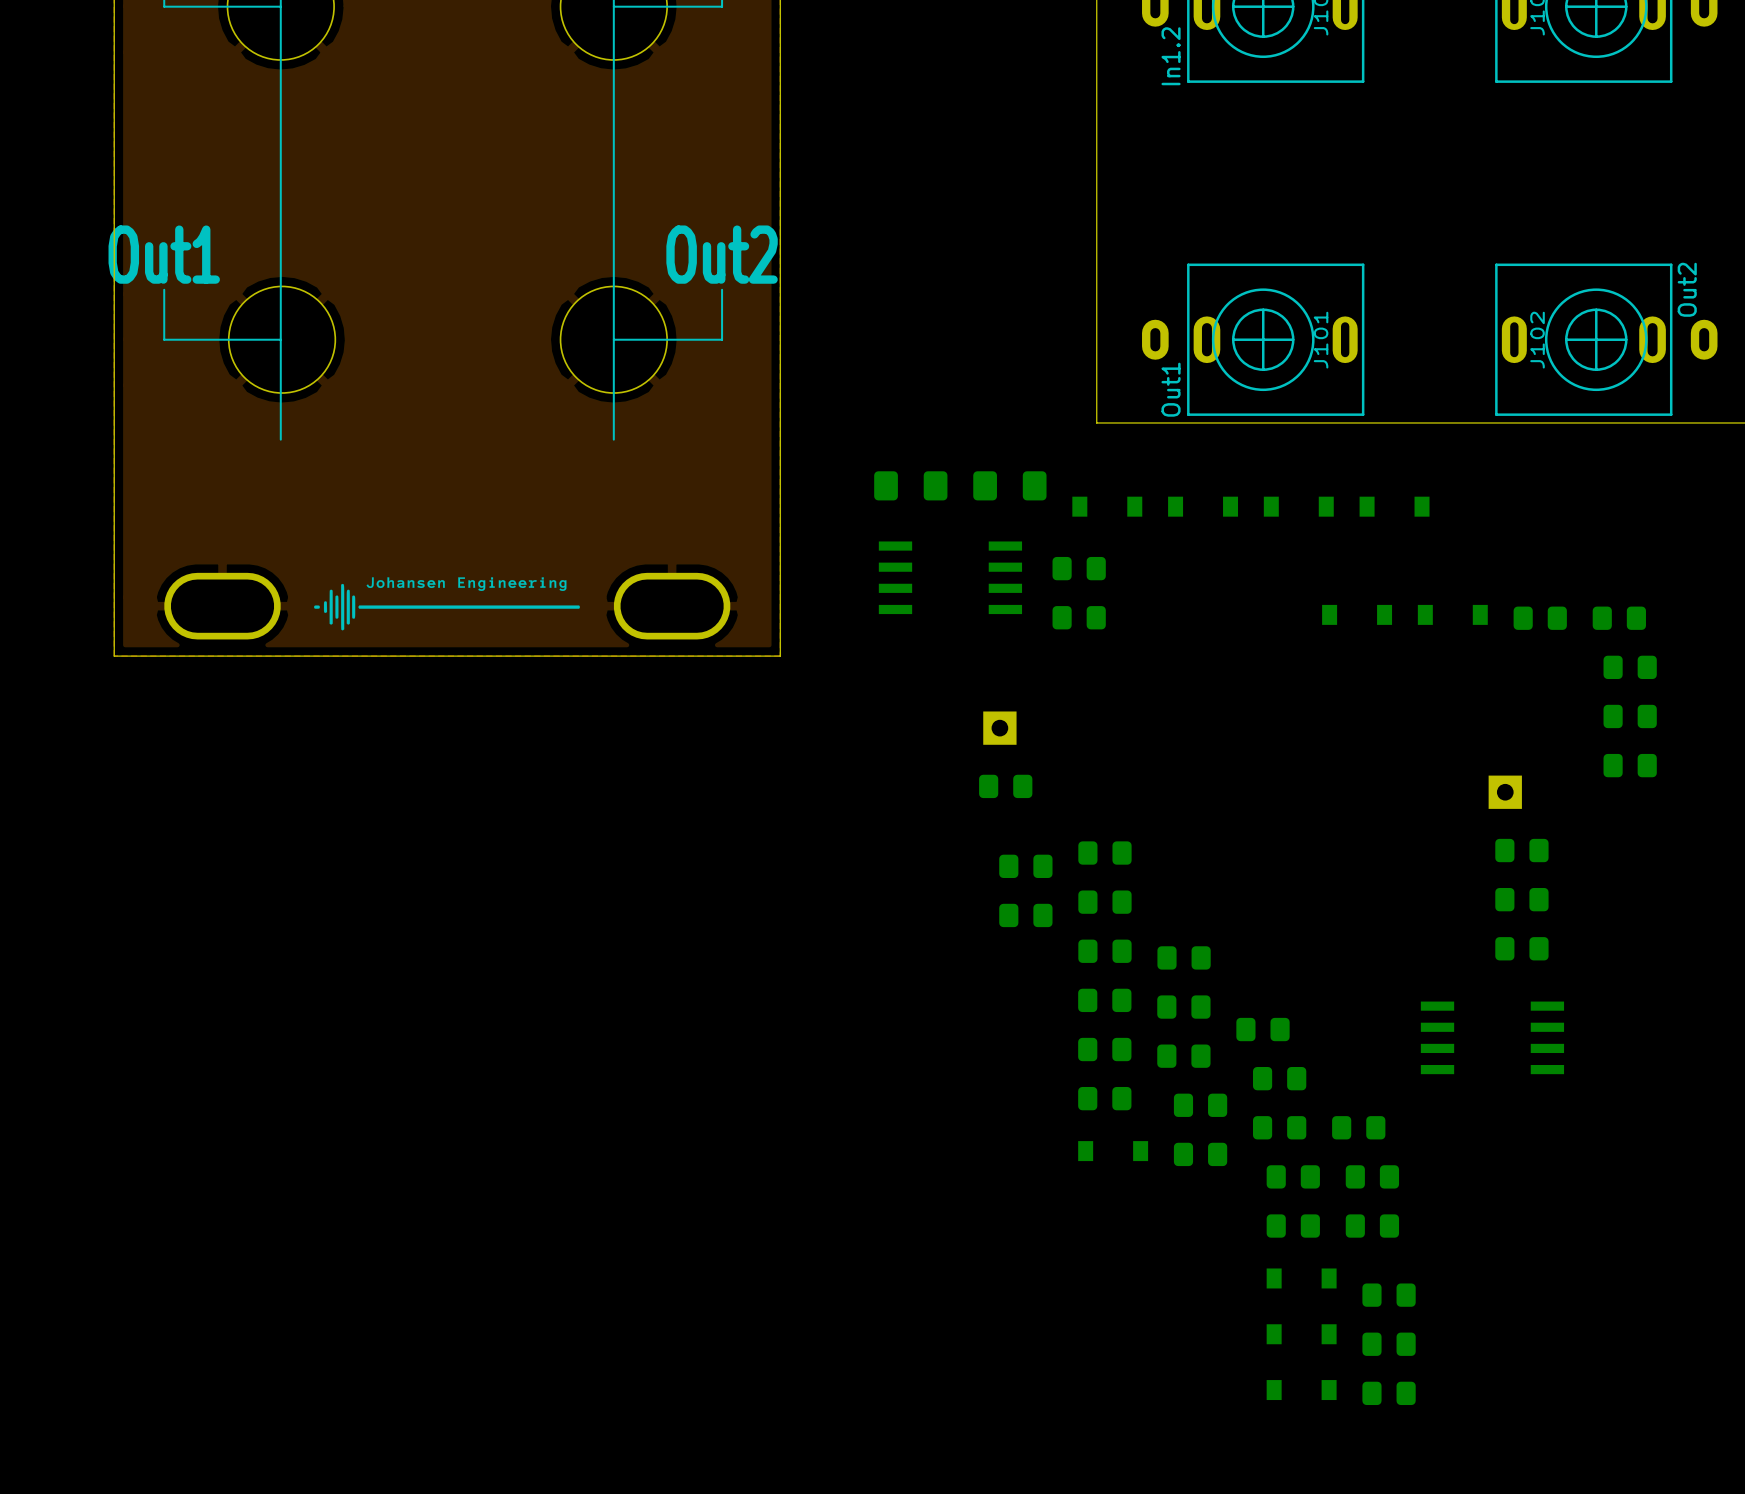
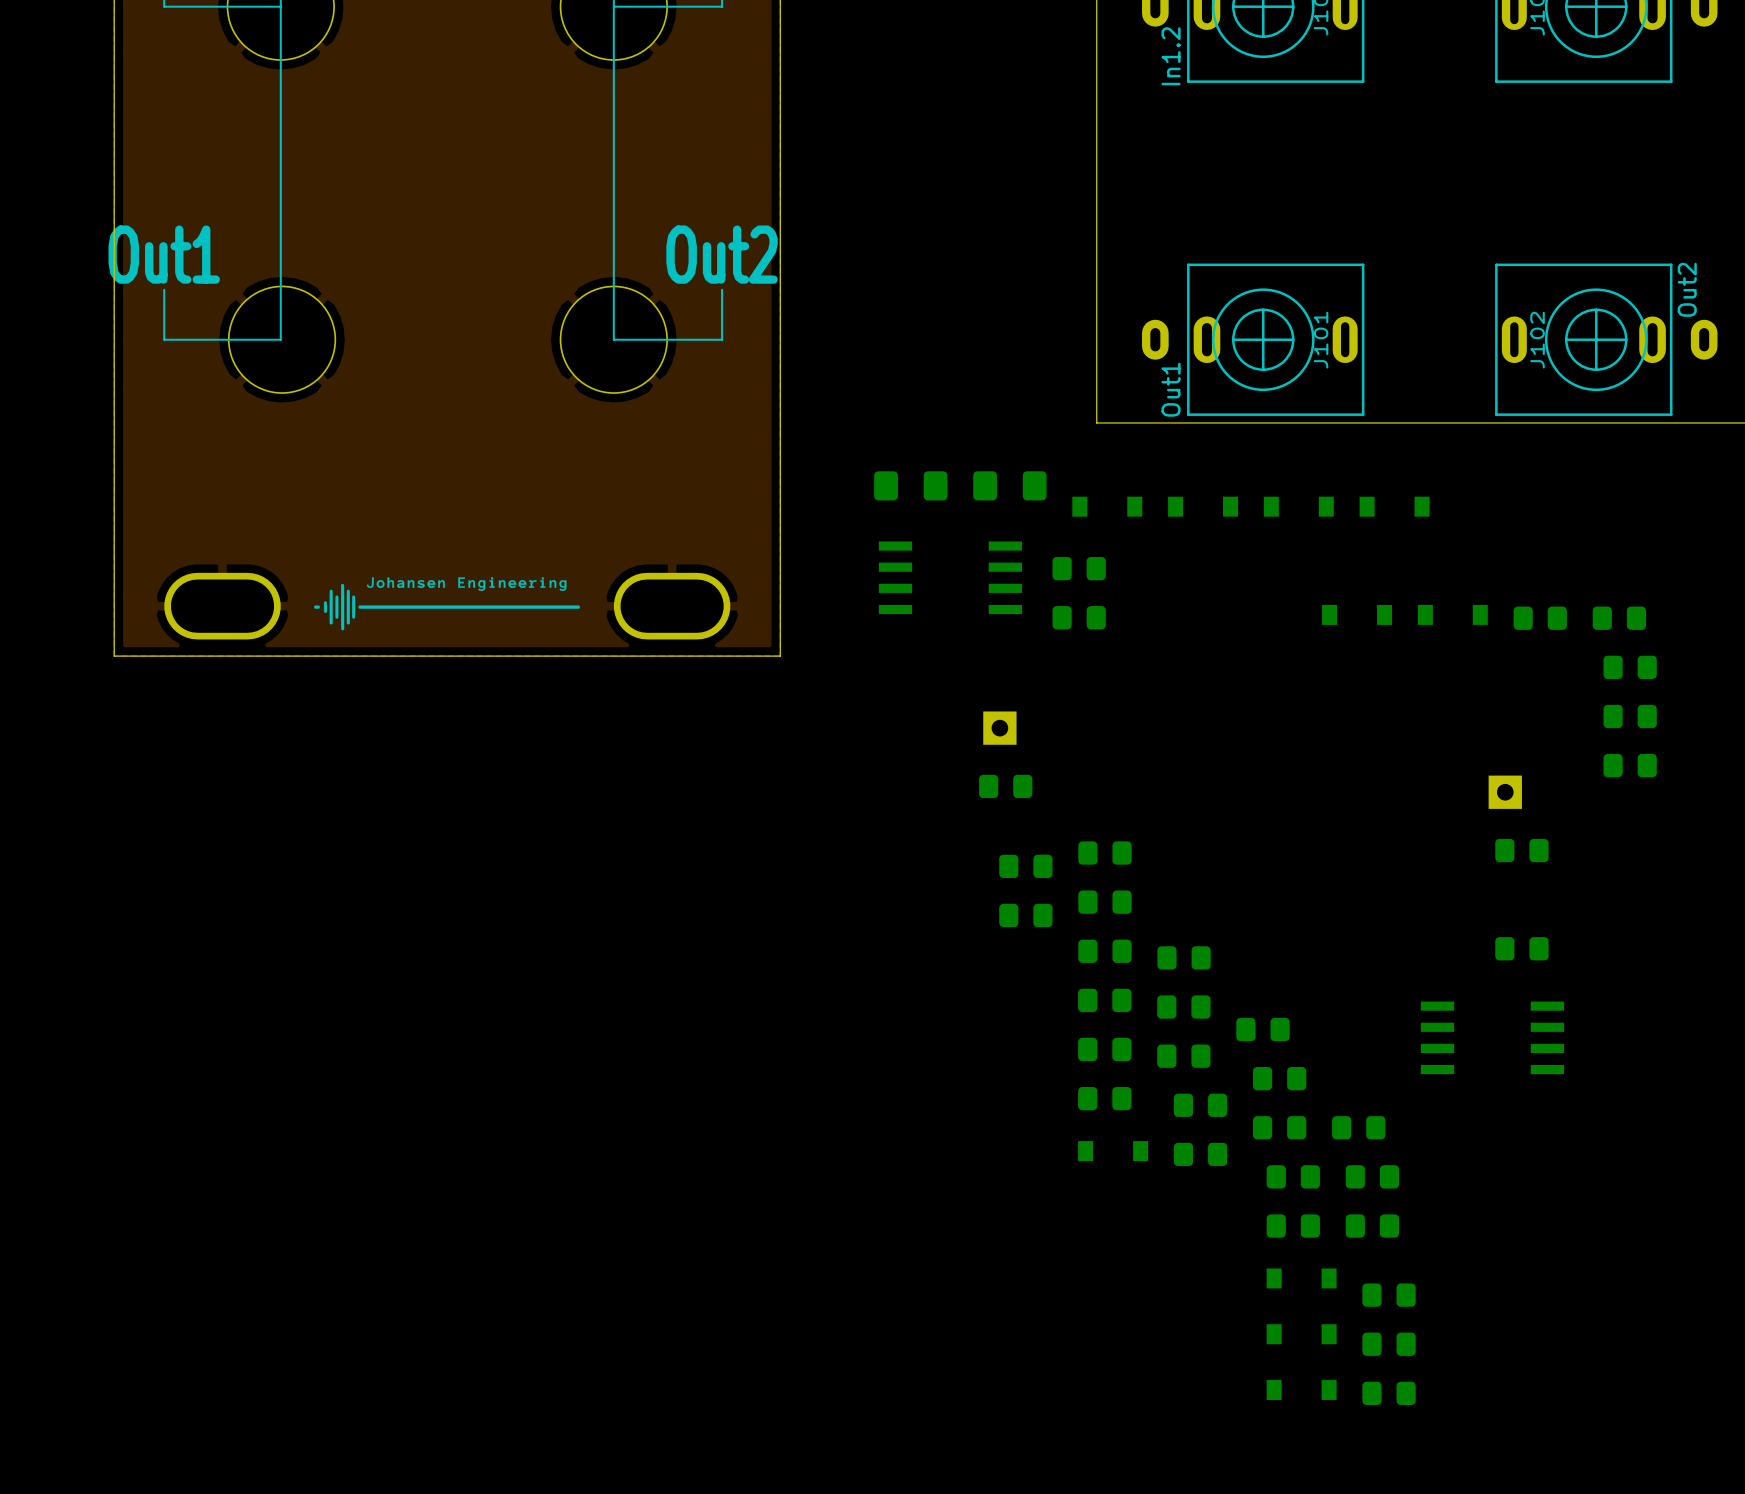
line: (280, 339) (280, 439) -> none
line: (613, 339) (613, 439) -> none
part: (1521, 899) -> none

